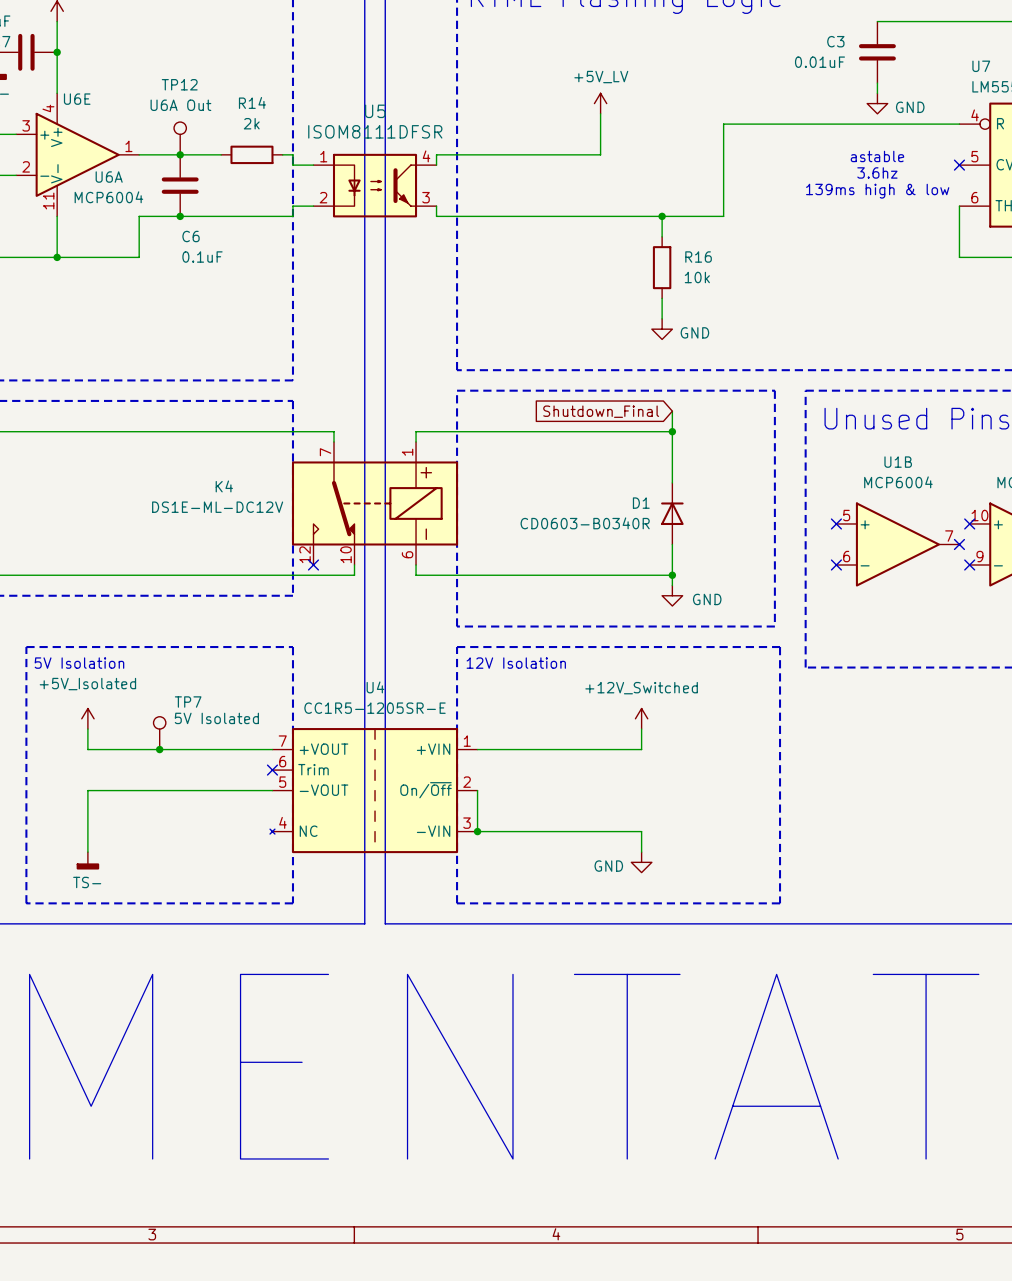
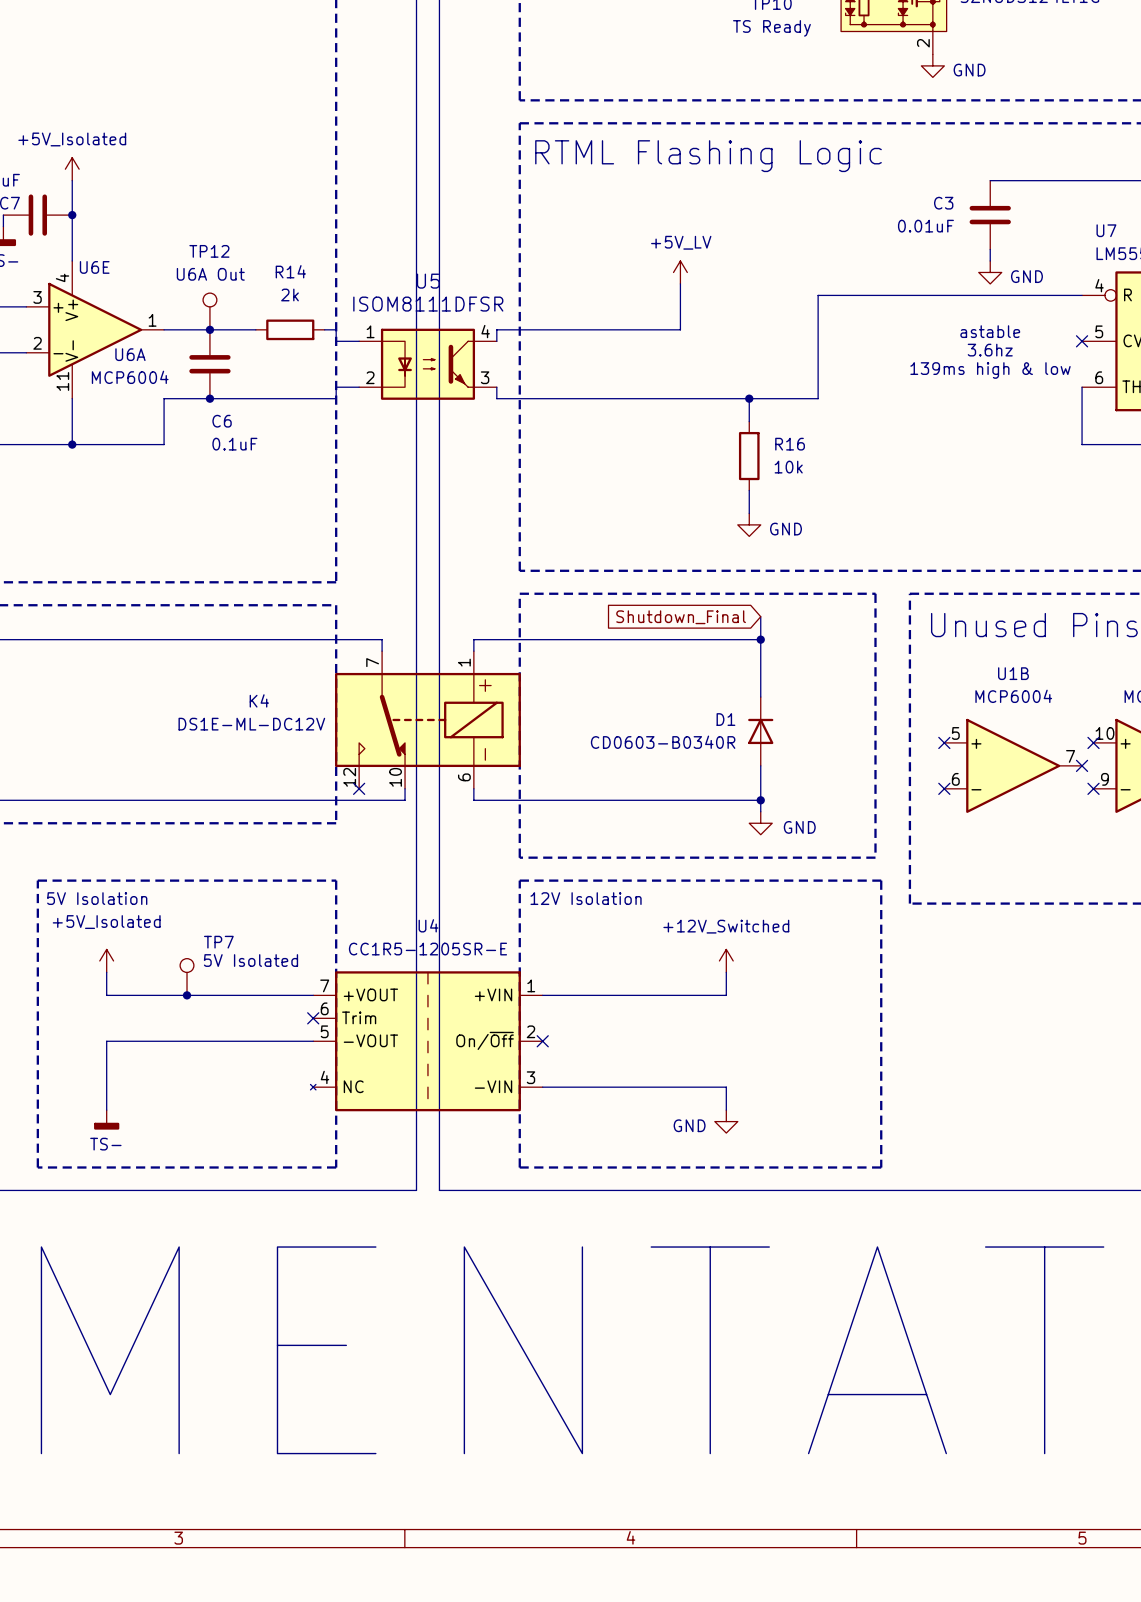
wire: (477, 790) (477, 831) -> none
no-connect mark: none -> (542, 1041)
junction: (477, 831) -> none

